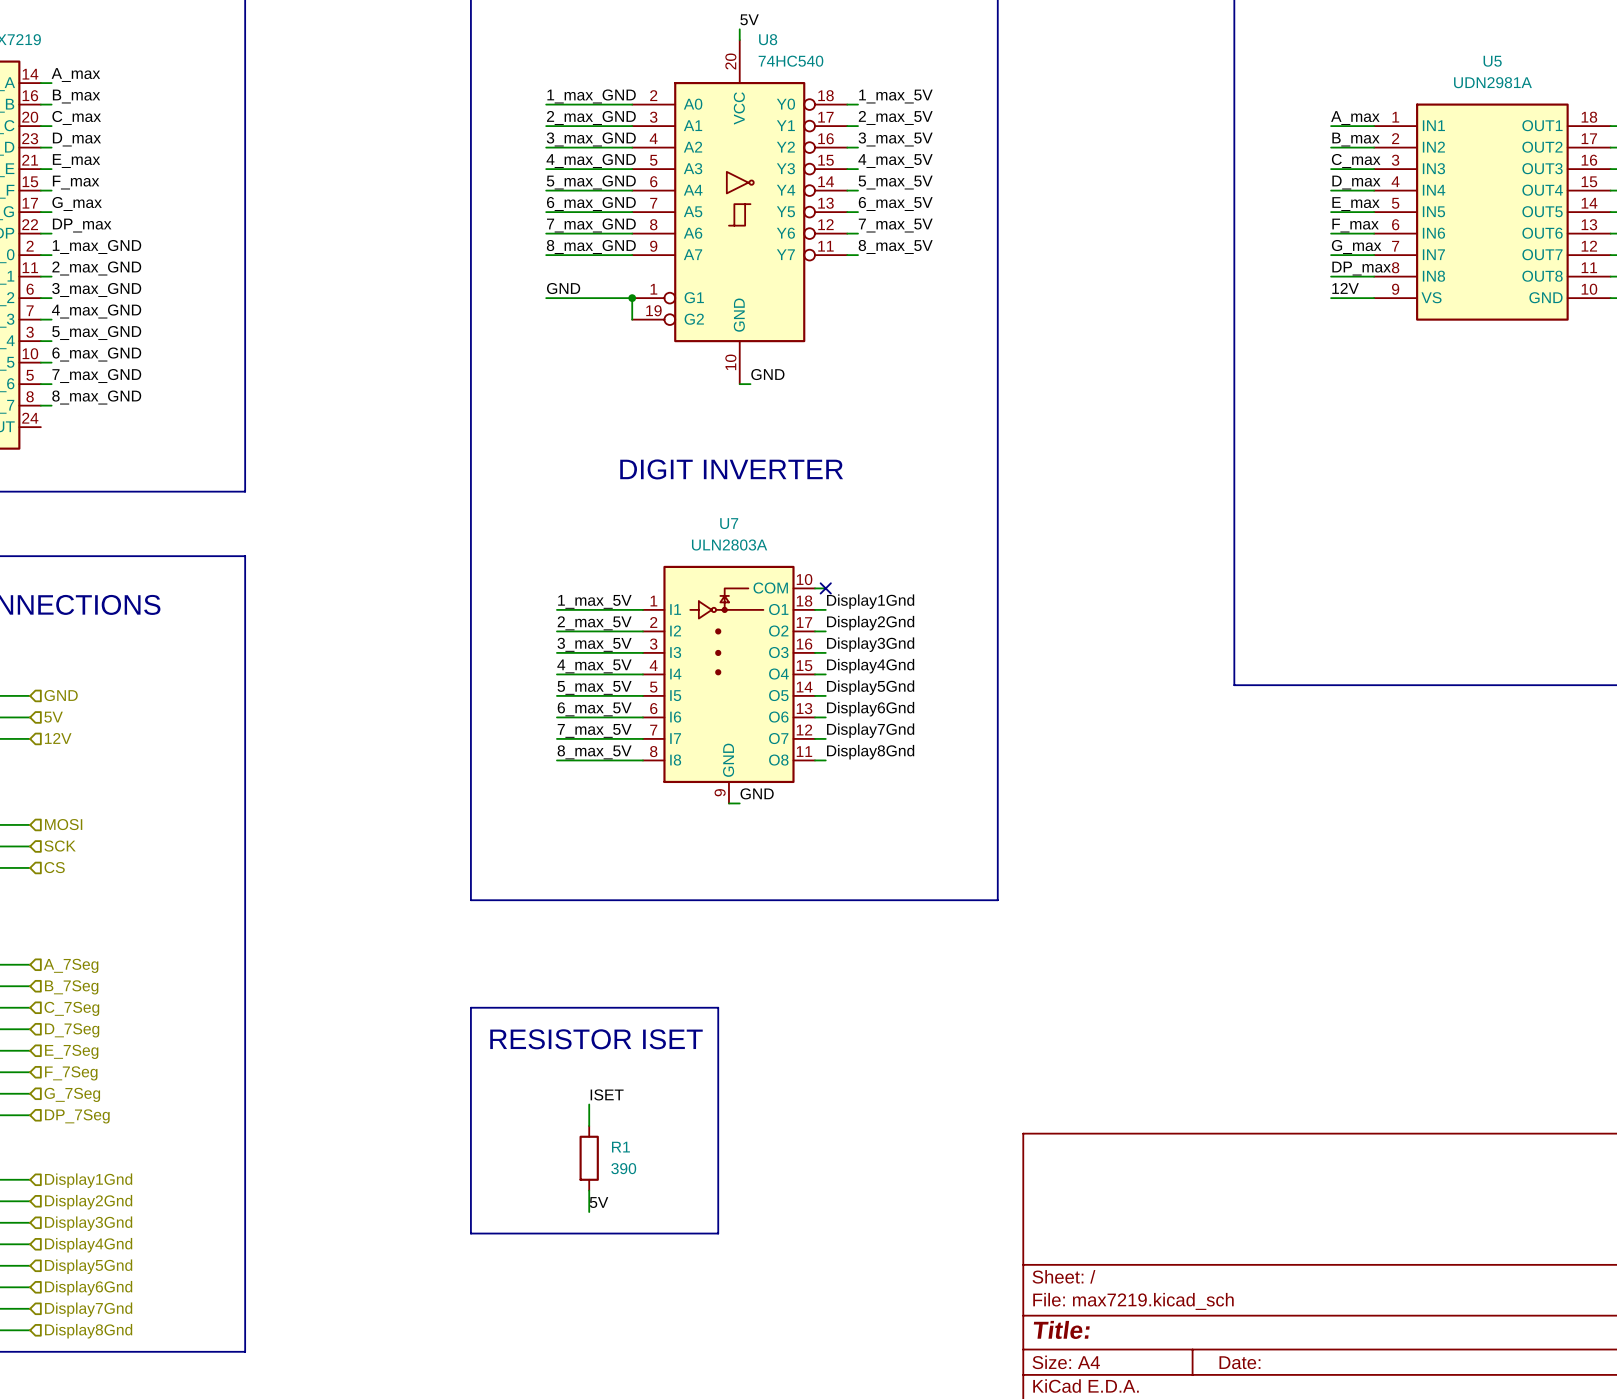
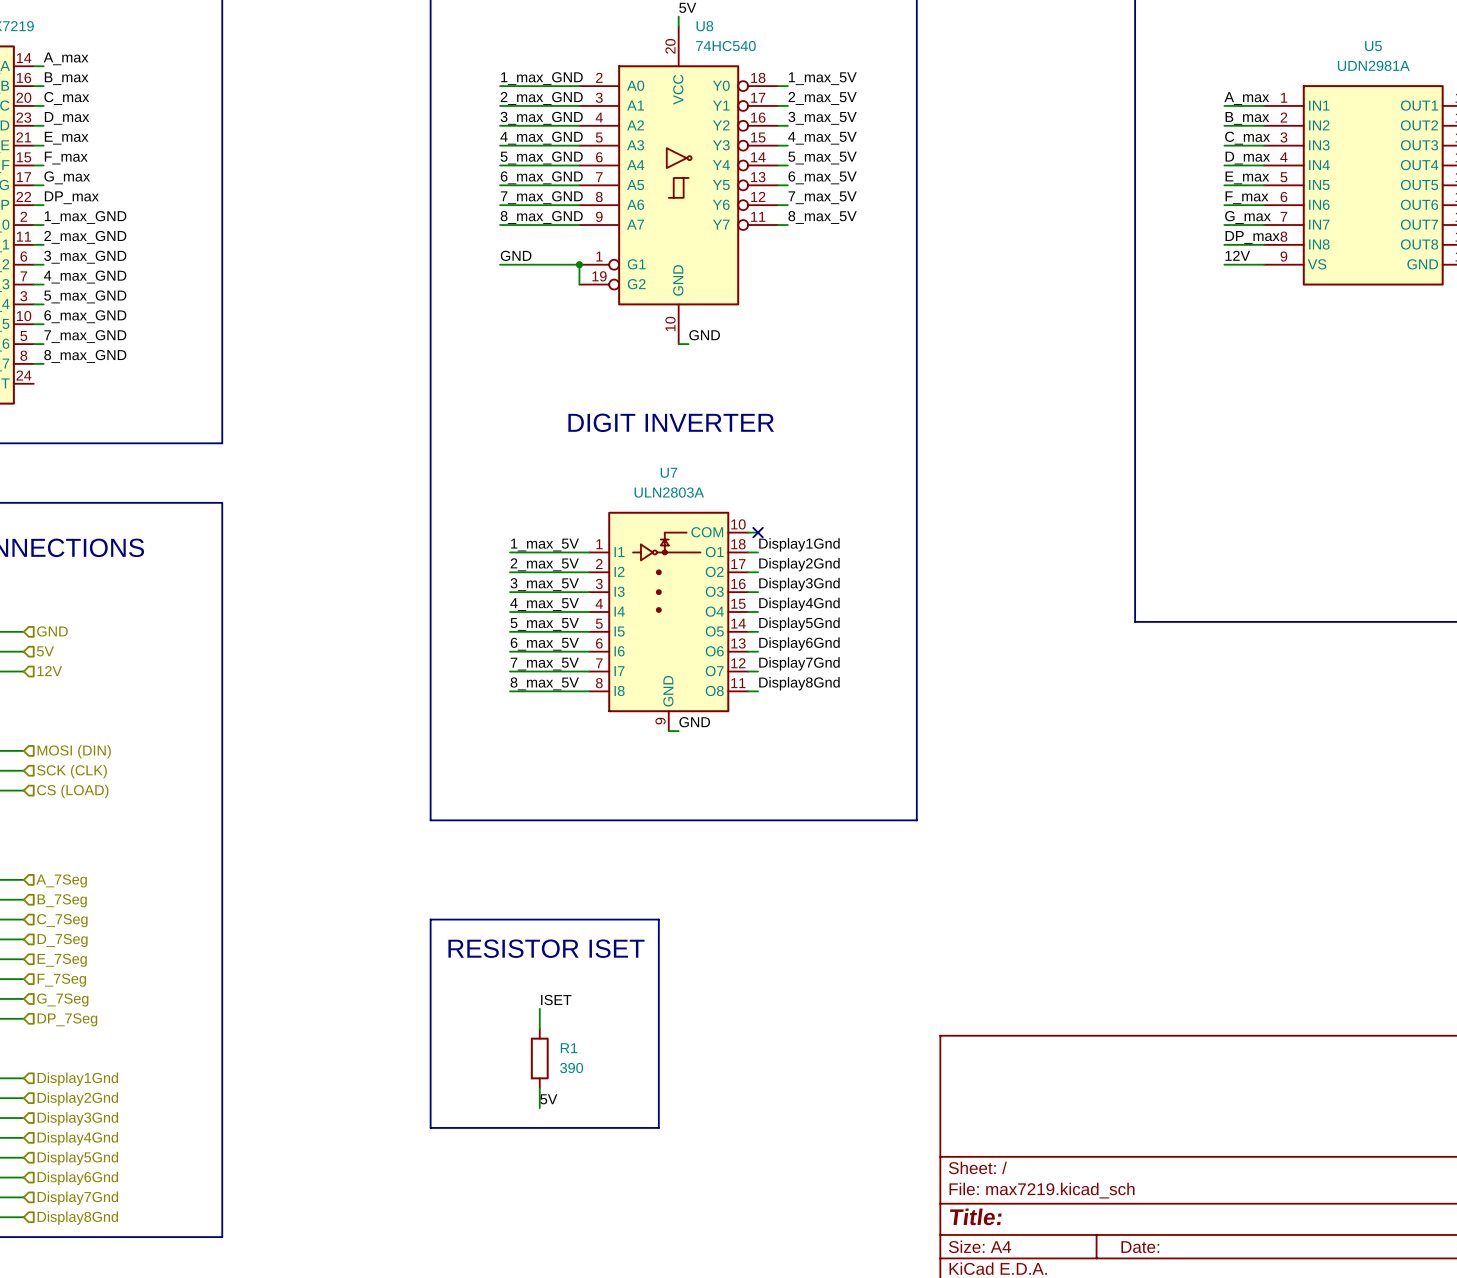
hierarchical label: MOSI (63, 824) -> MOSI (DIN) (74, 751)
hierarchical label: SCK (60, 846) -> SCK (CLK) (71, 771)
hierarchical label: CS (54, 867) -> CS (LOAD) (72, 791)

